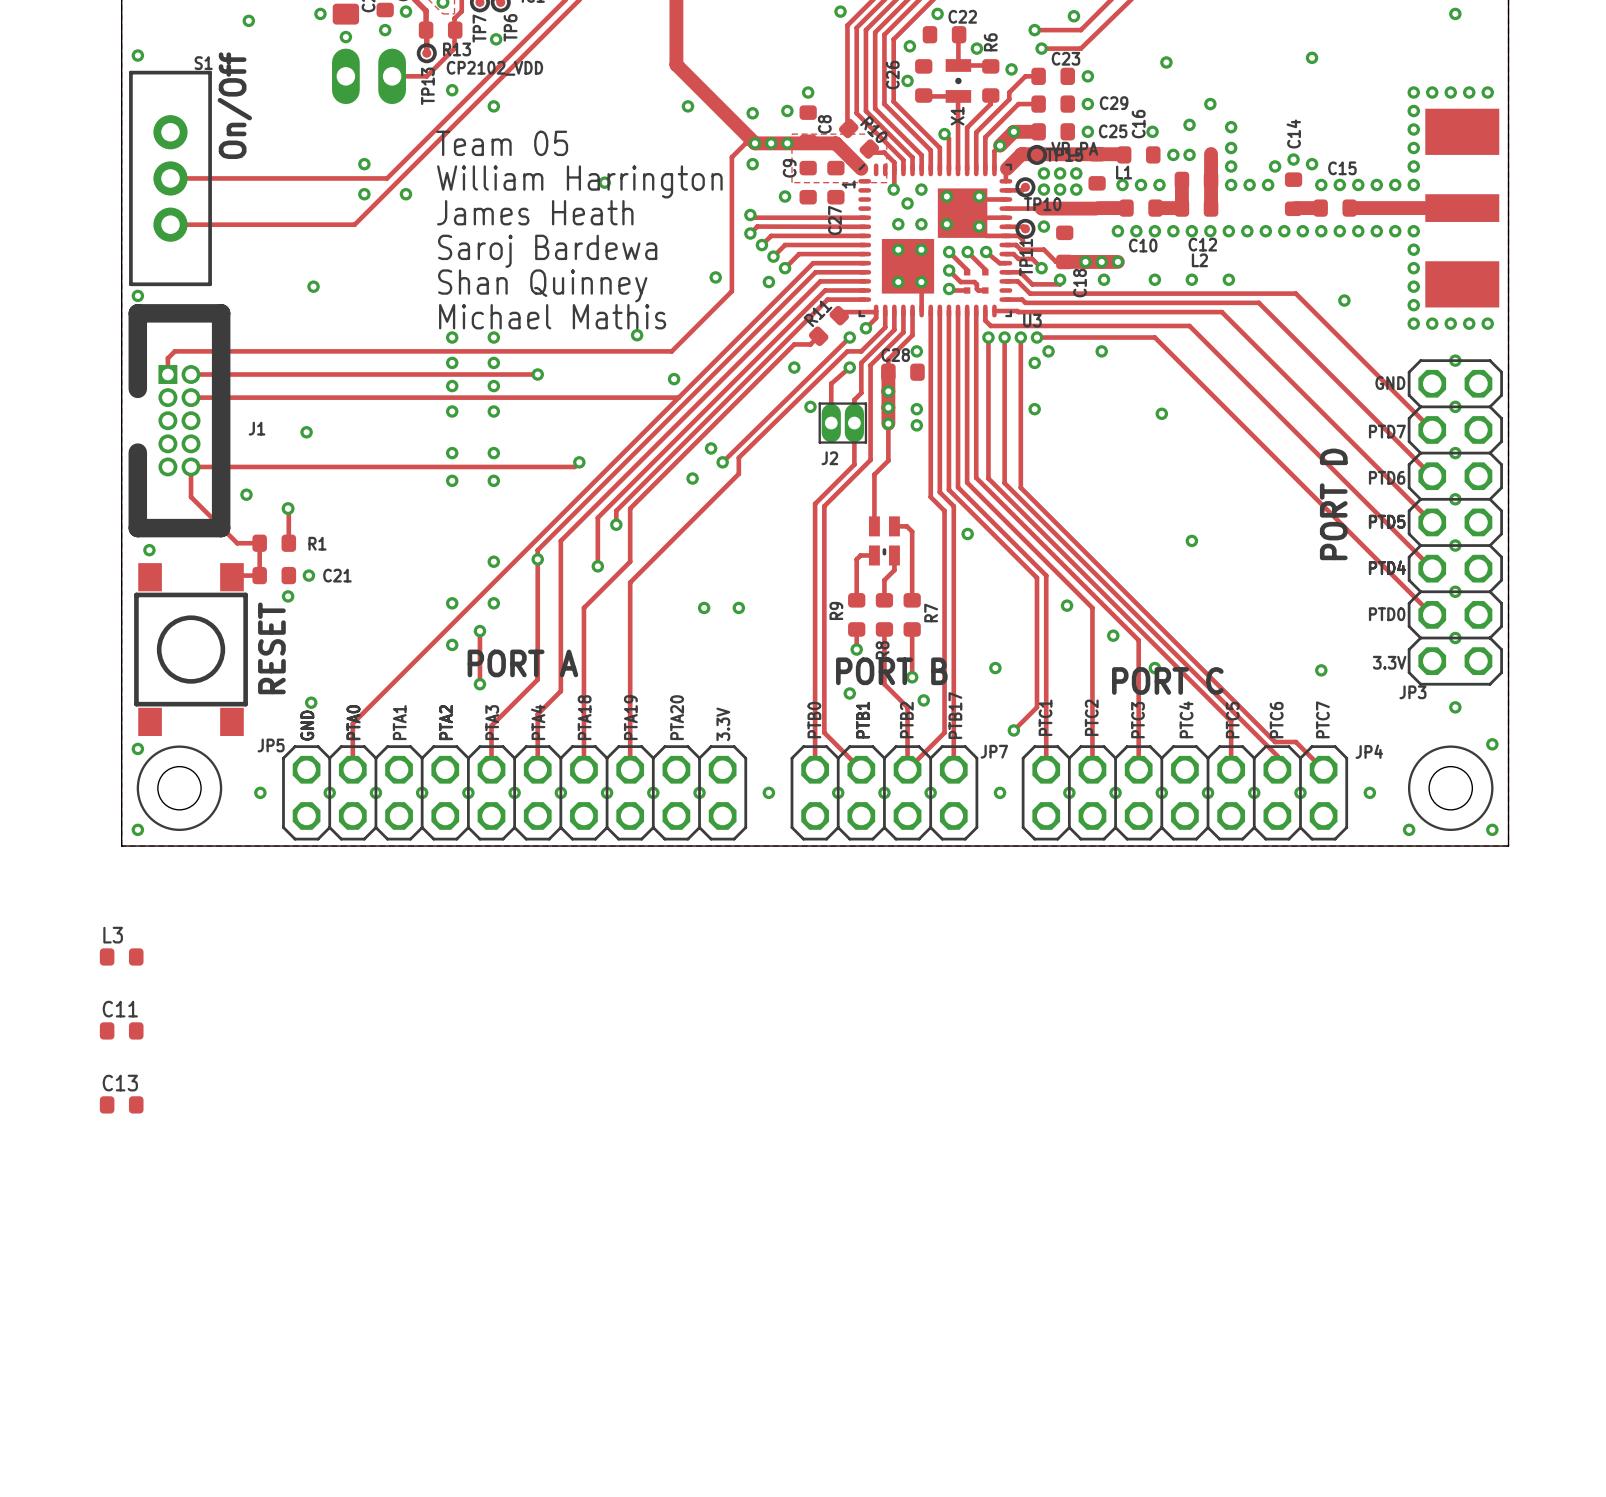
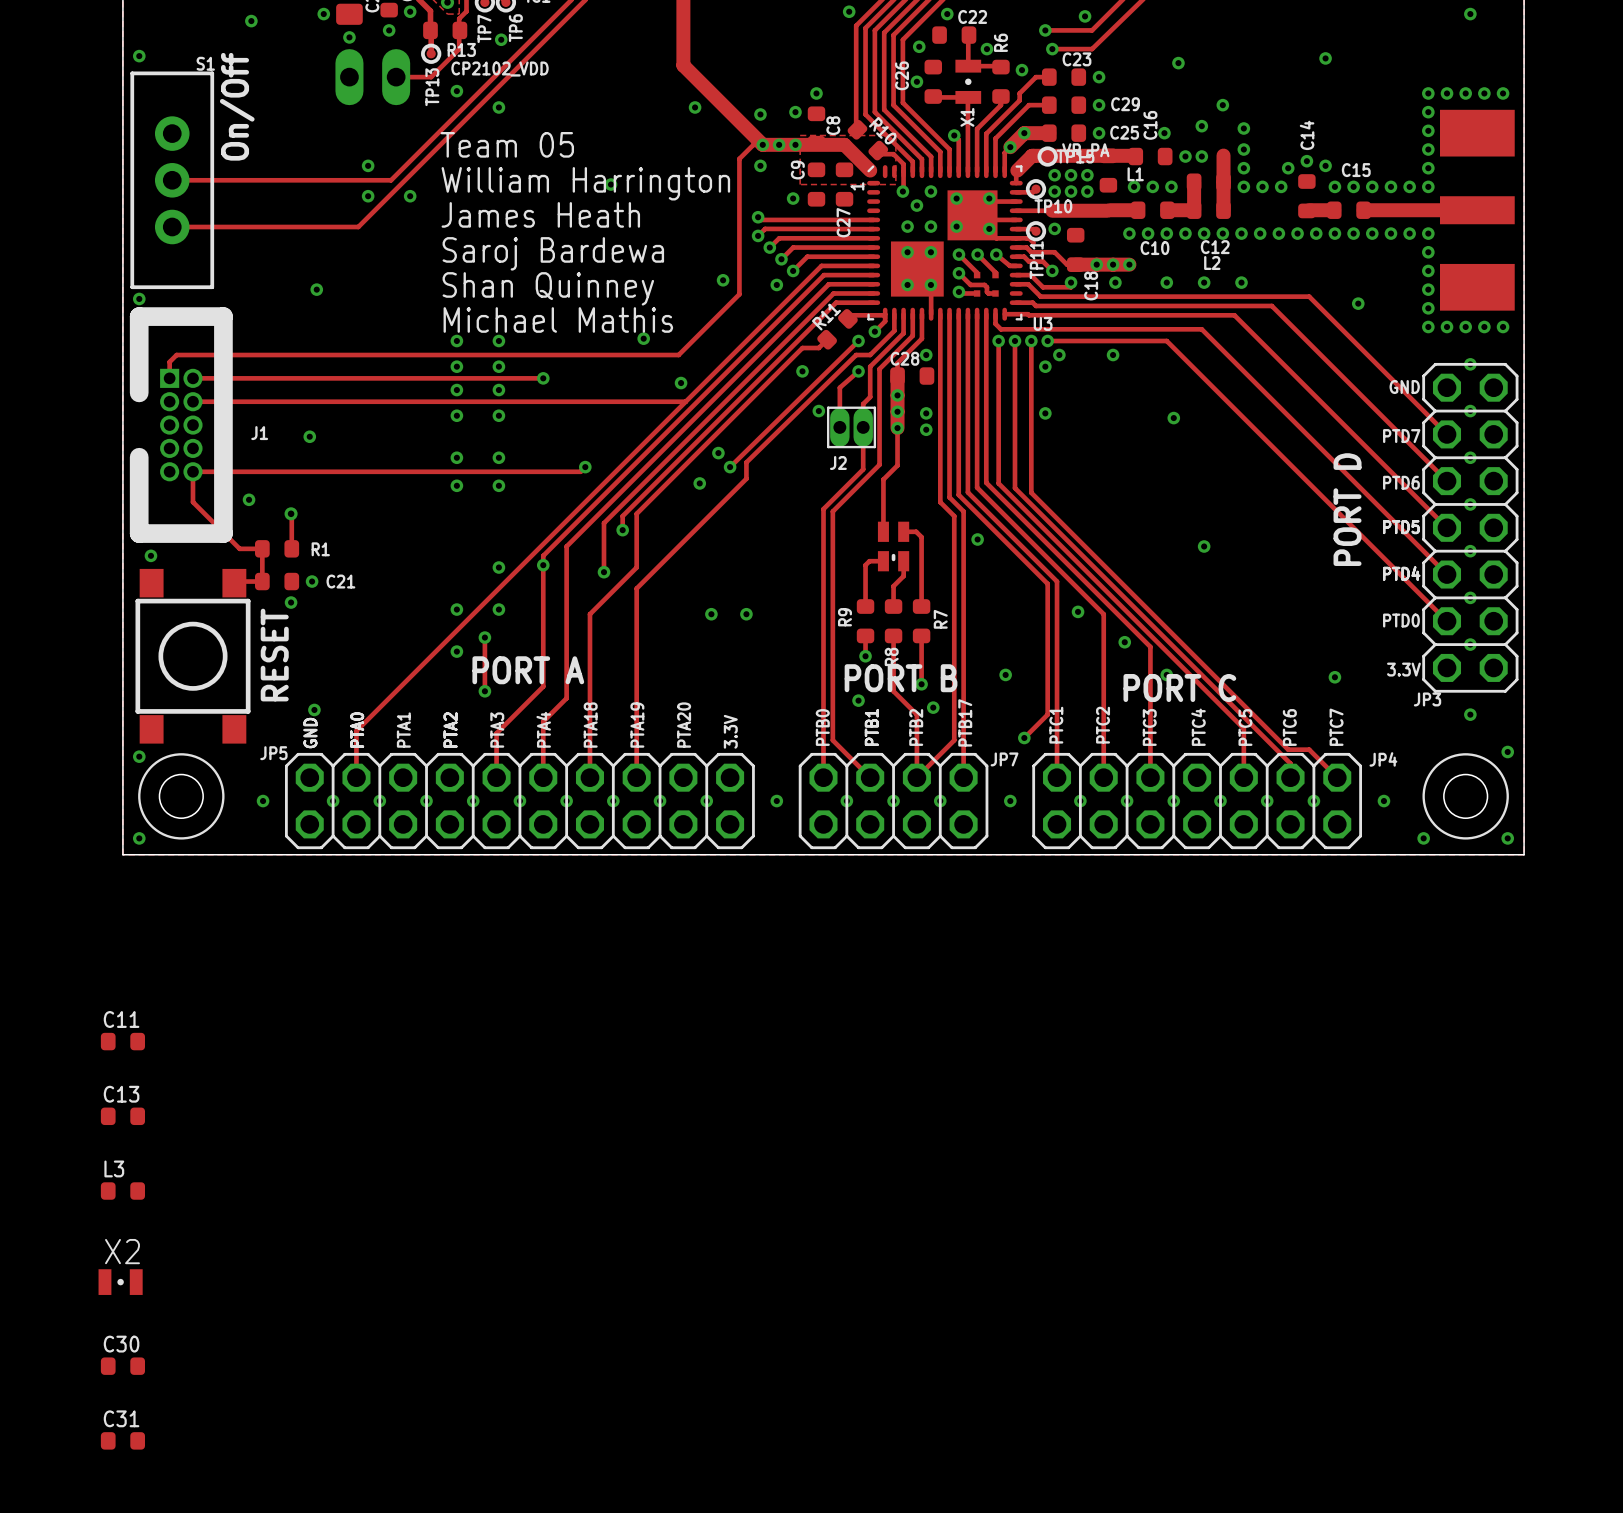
L3 position: (121, 956) -> (122, 1191)
X2: none -> (120, 1282)
C30: none -> (122, 1366)
C31: none -> (122, 1440)

